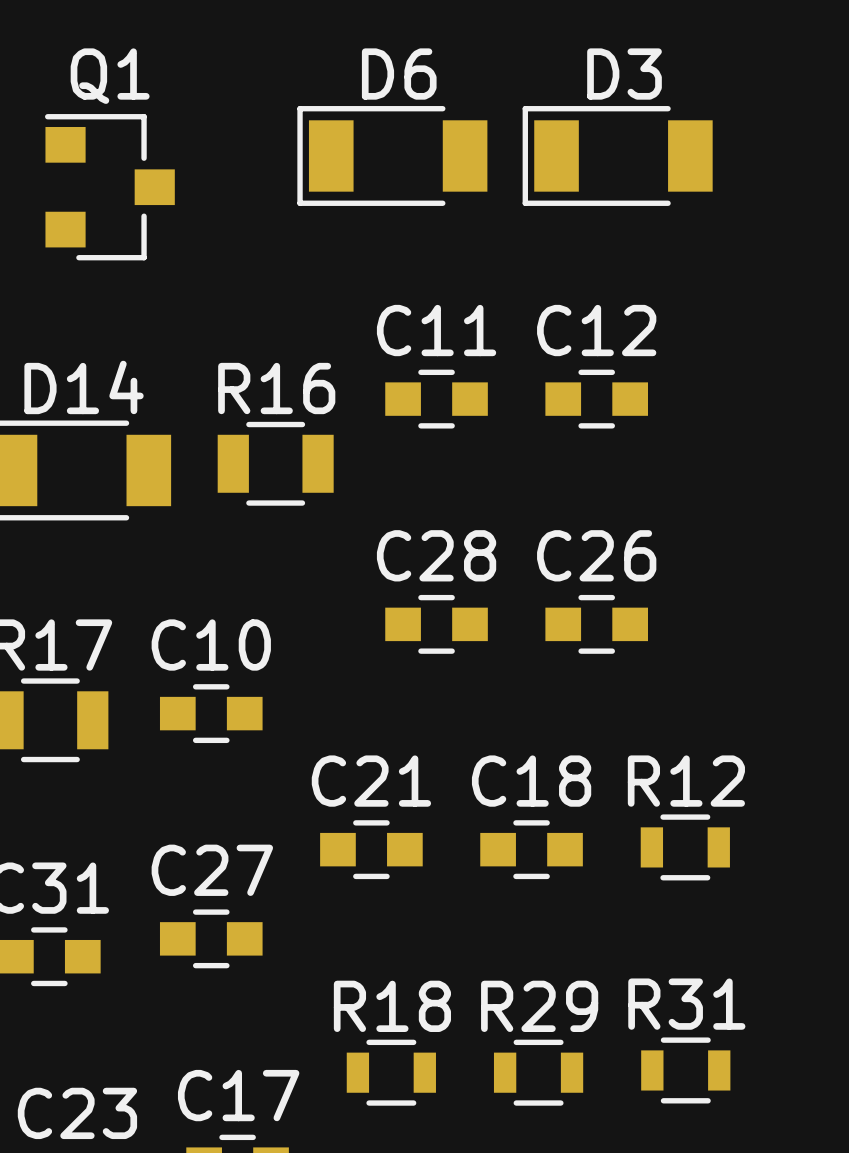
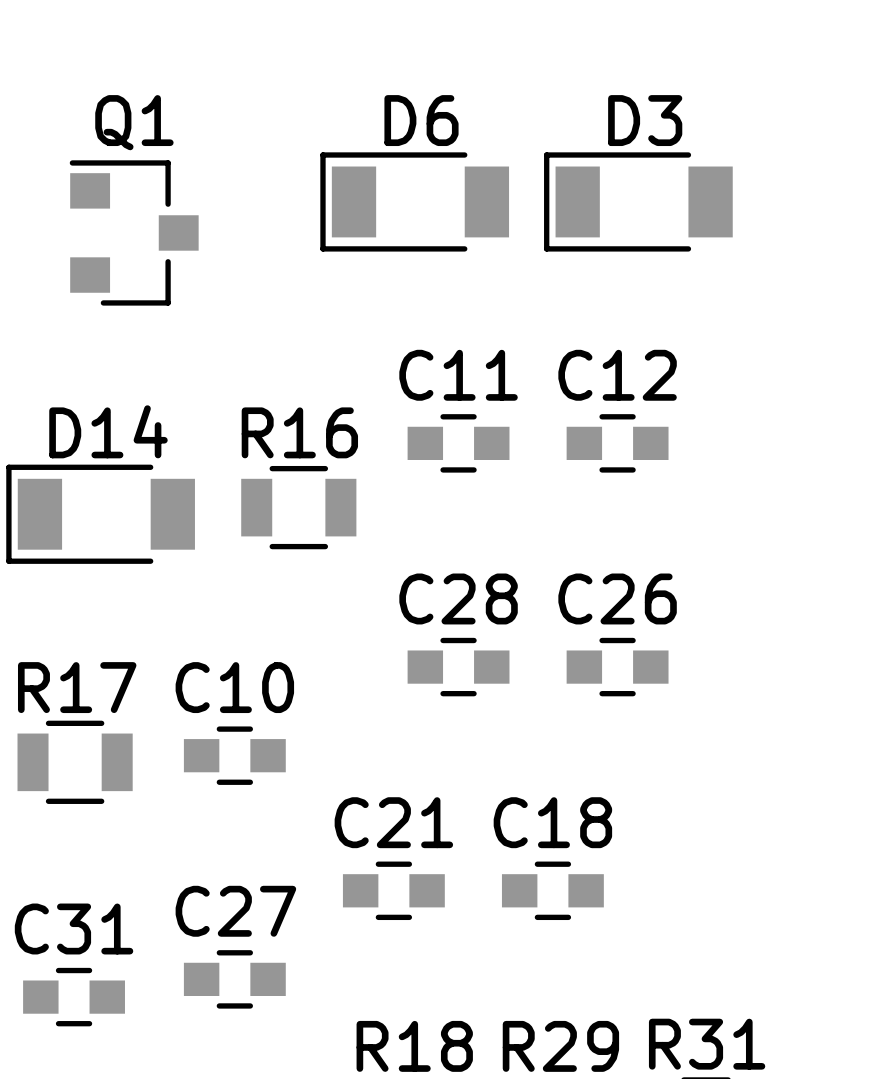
R12: (685, 847) -> none

